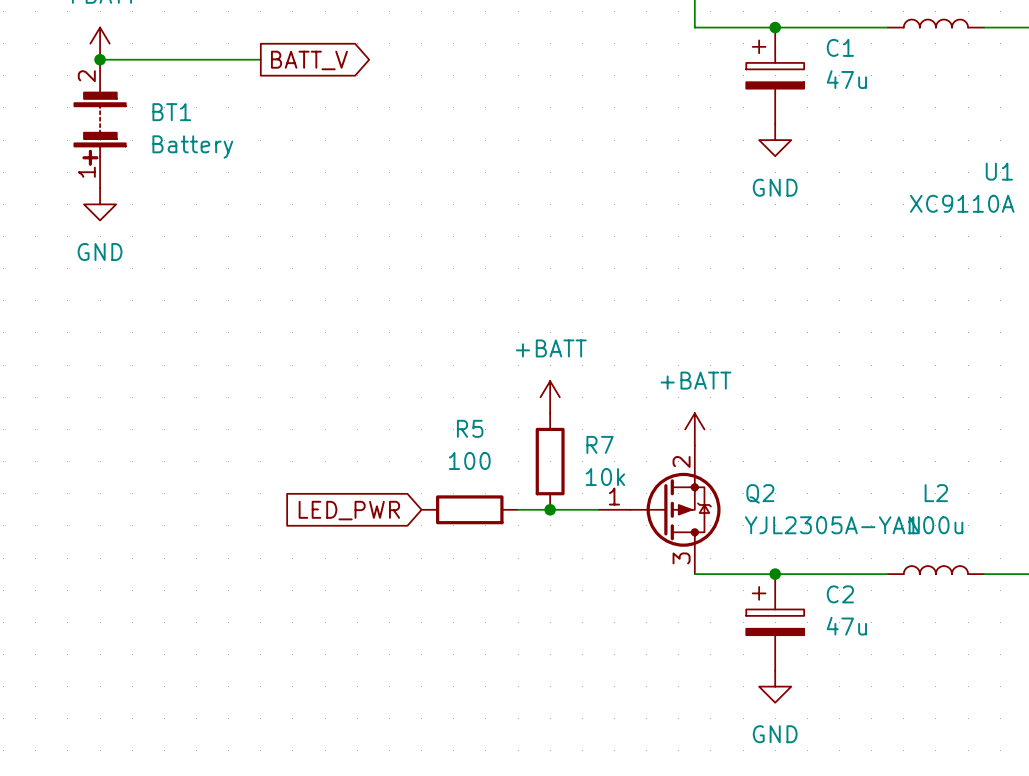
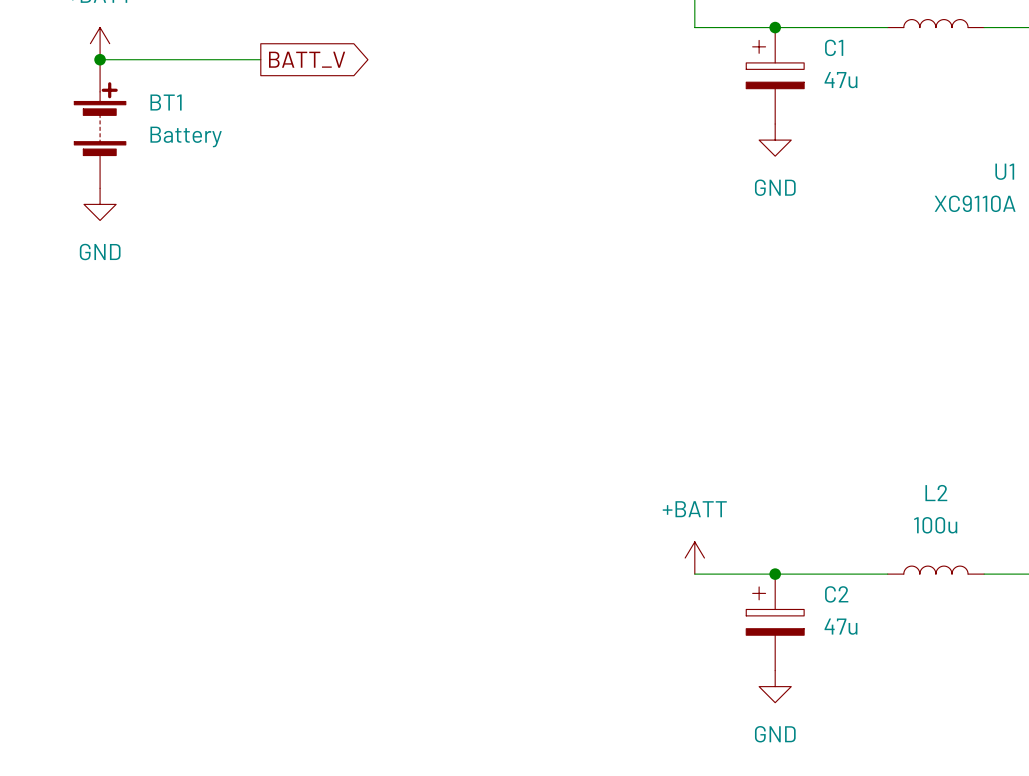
BT1 symbol: [74, 59, 126, 189] -> [74, 59, 126, 189]
power symbol: +BATT (550, 397) -> none
power symbol: +BATT (694, 429) -> none
R7: 10k (550, 461) -> none
R5: 100 (469, 509) -> none
wire: (518, 509) (598, 509) -> none
junction: (550, 509) -> none
Q2: YJL2305A-YAN (659, 509) -> none
global label: LED_PWR (349, 510) -> none
power symbol: none -> +BATT (694, 558)

